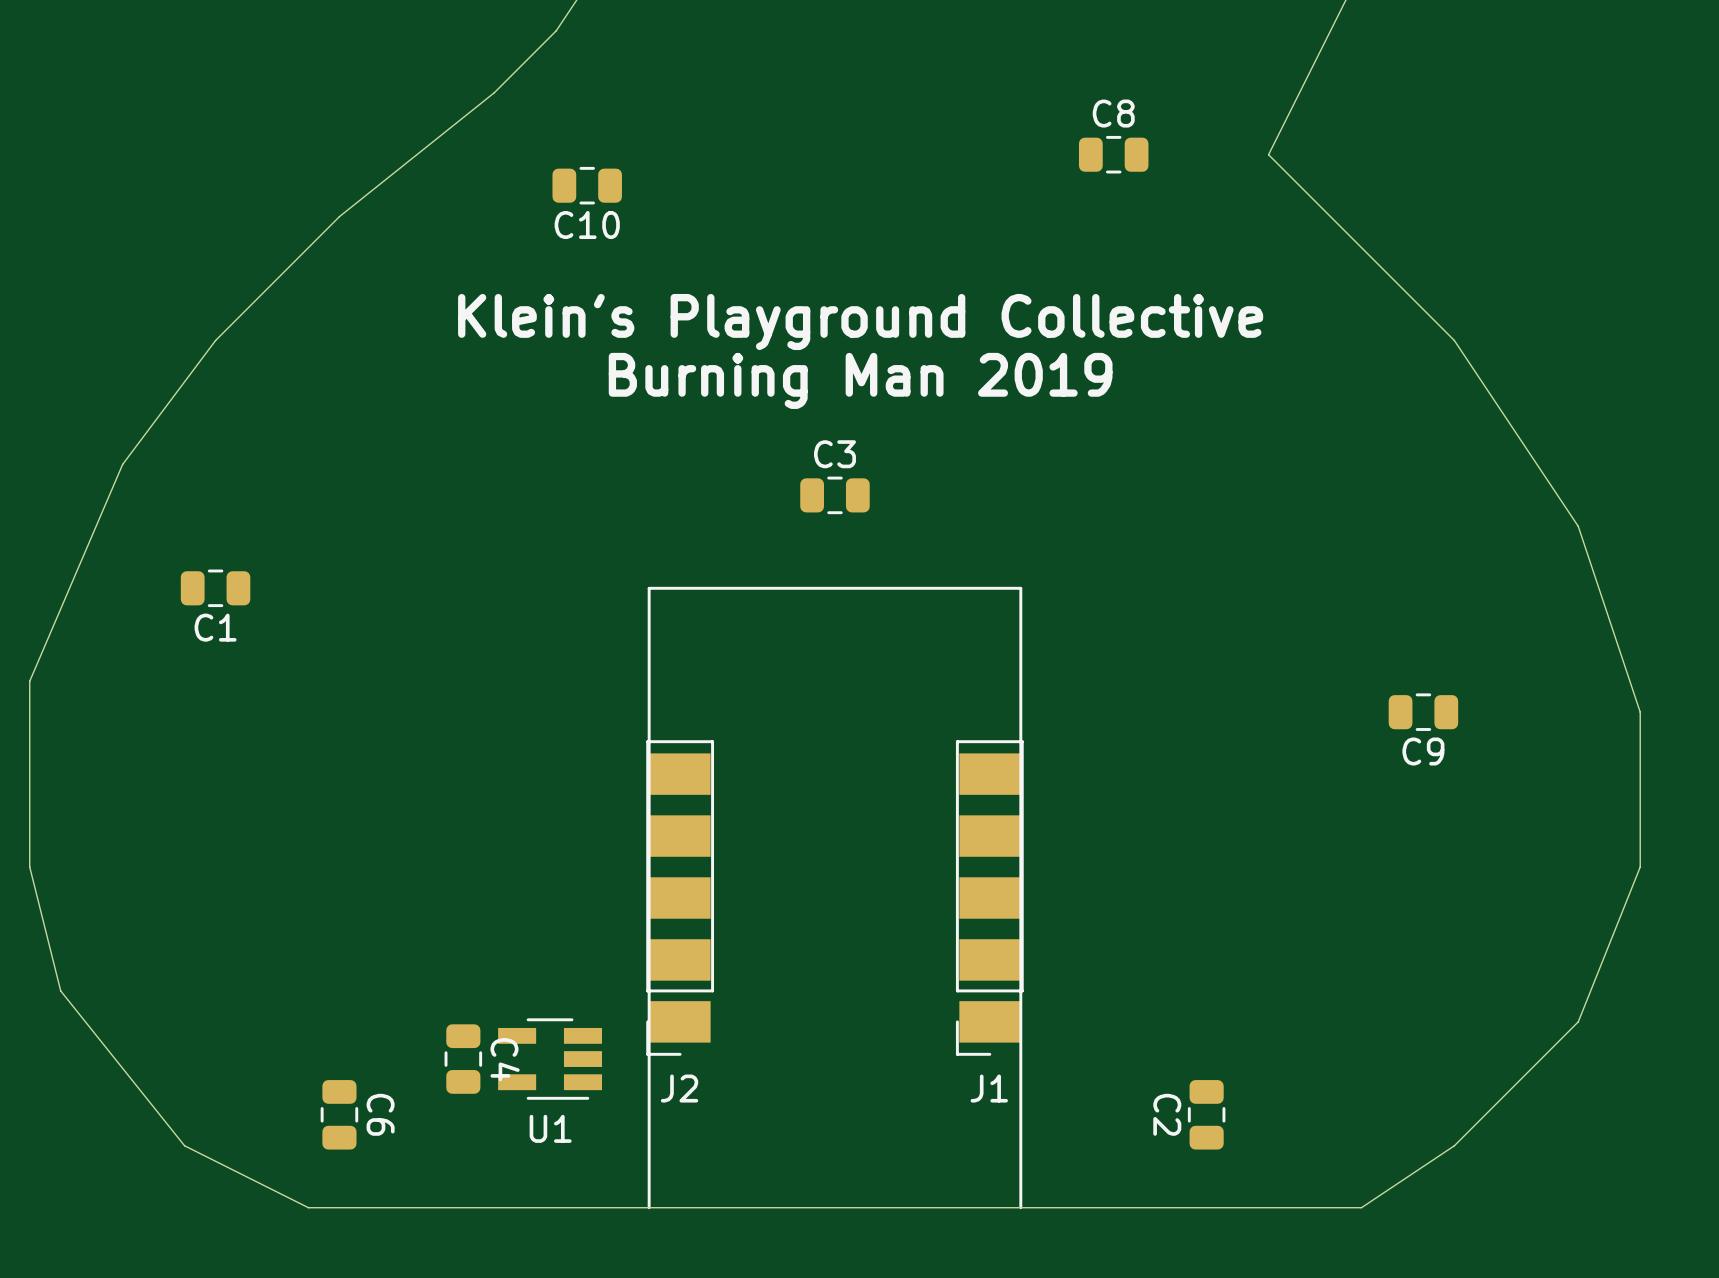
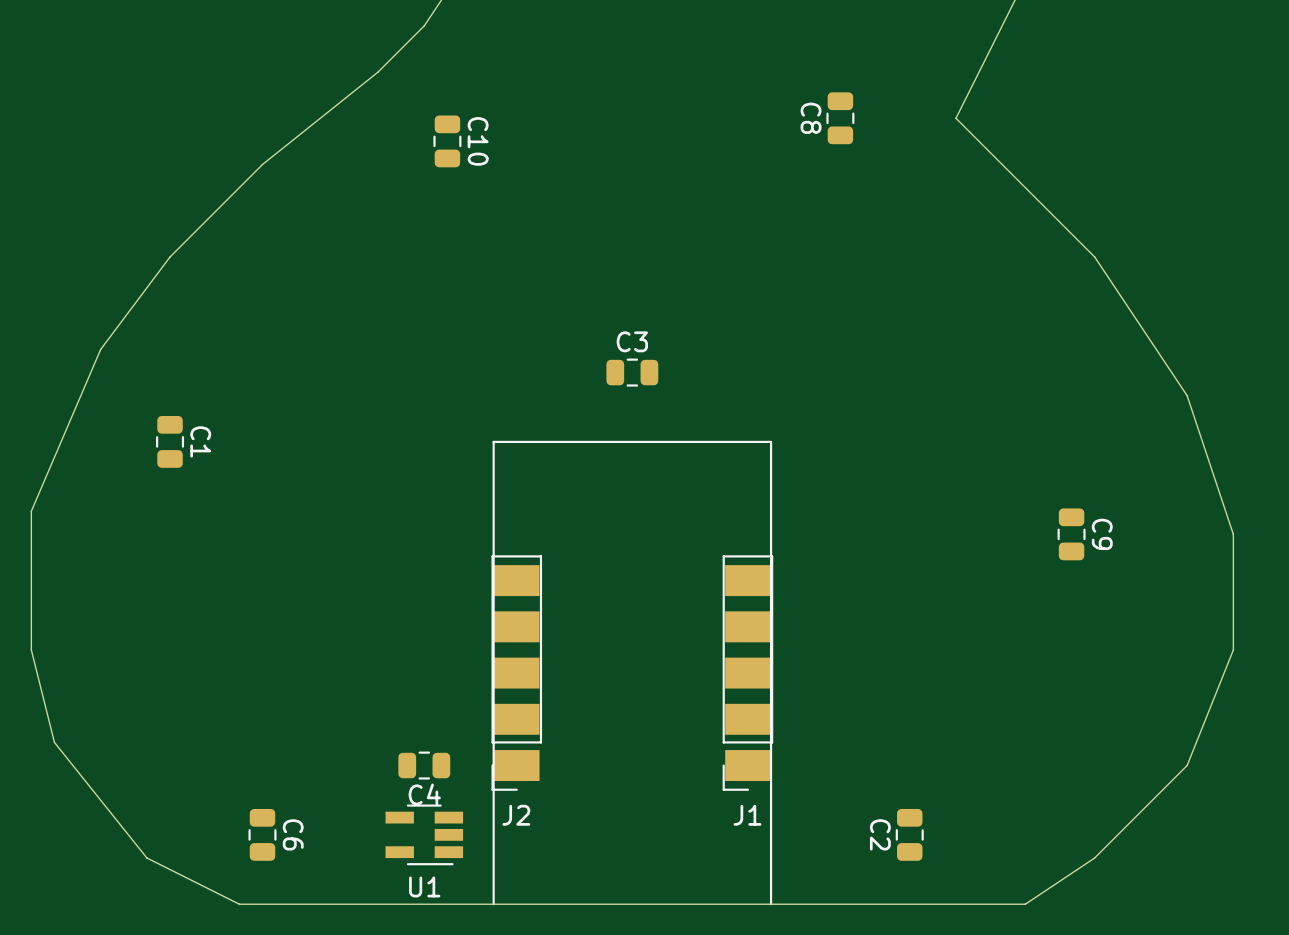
C8 name position: C8 (1113, 113) -> C8 (811, 118)
C8 rotation: 0° (1113, 154) -> 90° clockwise (840, 118)
C10 rotation: 0° (587, 185) -> 90° clockwise (447, 141)
C10 name position: C10 (587, 225) -> C10 (478, 141)
text: Klein's Playground Collective (860, 322) -> none
text: Burning Man 2019 (860, 380) -> none
C1 rotation: 0° (215, 588) -> 90° clockwise (170, 441)
C1 name position: C1 (215, 627) -> C1 (200, 441)
C9 rotation: 0° (1423, 712) -> 90° clockwise (1071, 534)
C9 name position: C9 (1423, 751) -> C9 (1102, 534)
C4 rotation: 0° (463, 1059) -> 90° clockwise (424, 765)
C4 position: (463, 1059) -> (424, 765)
U1 position: (550, 1059) -> (424, 834)

